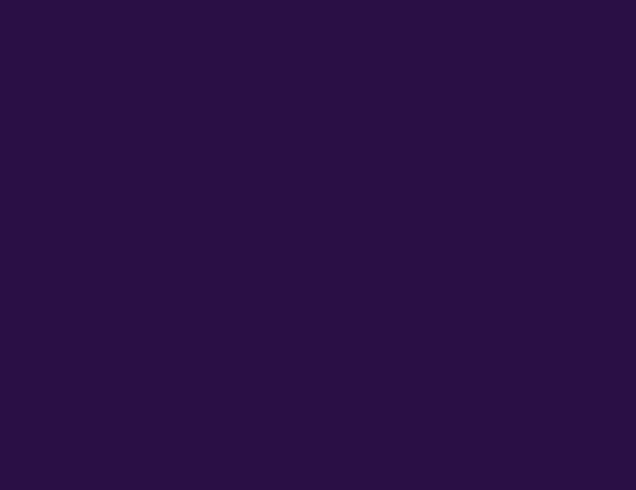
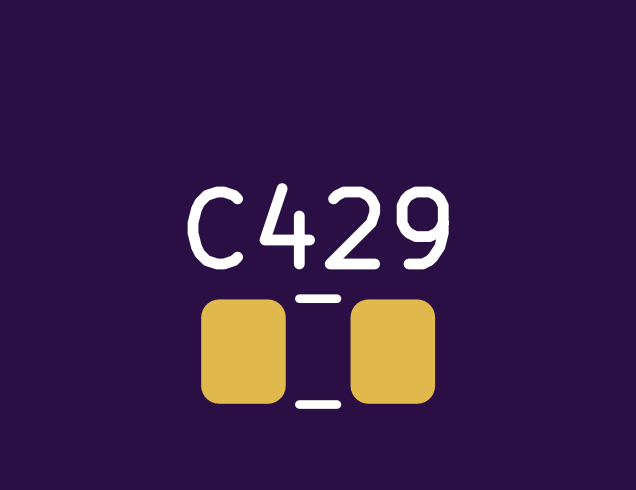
C429: none -> (318, 351)

